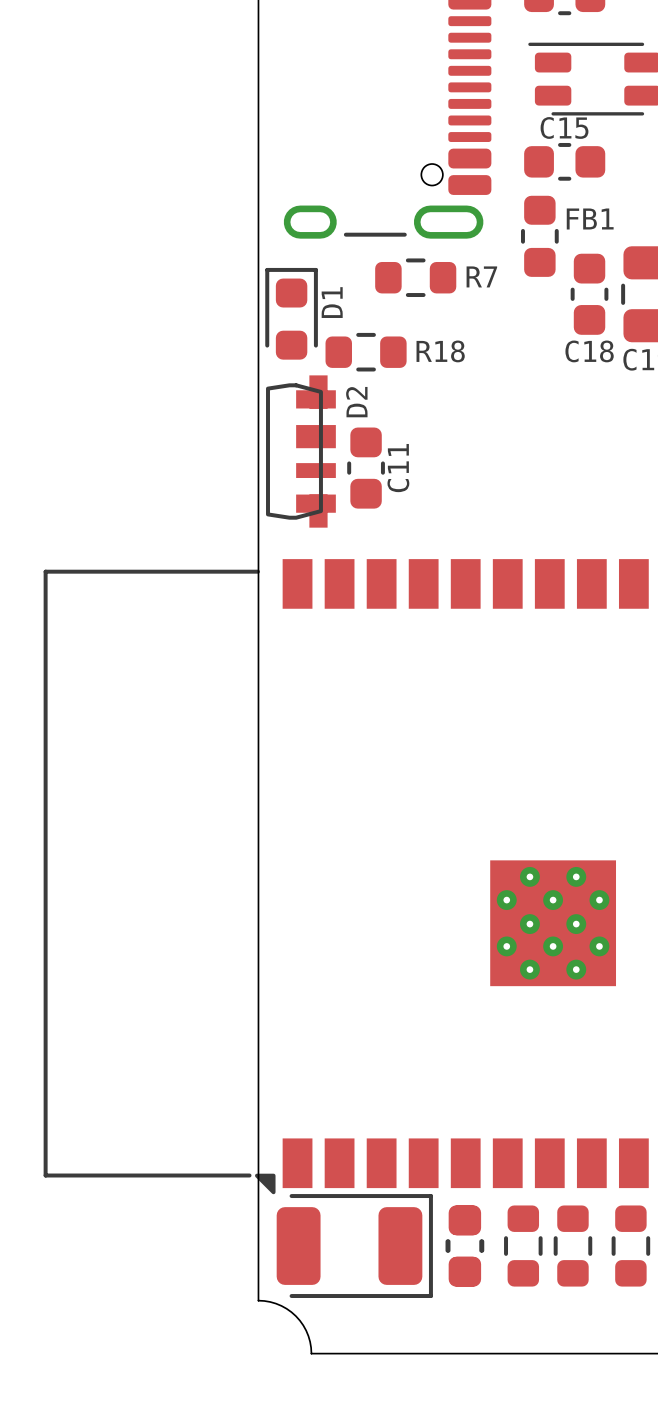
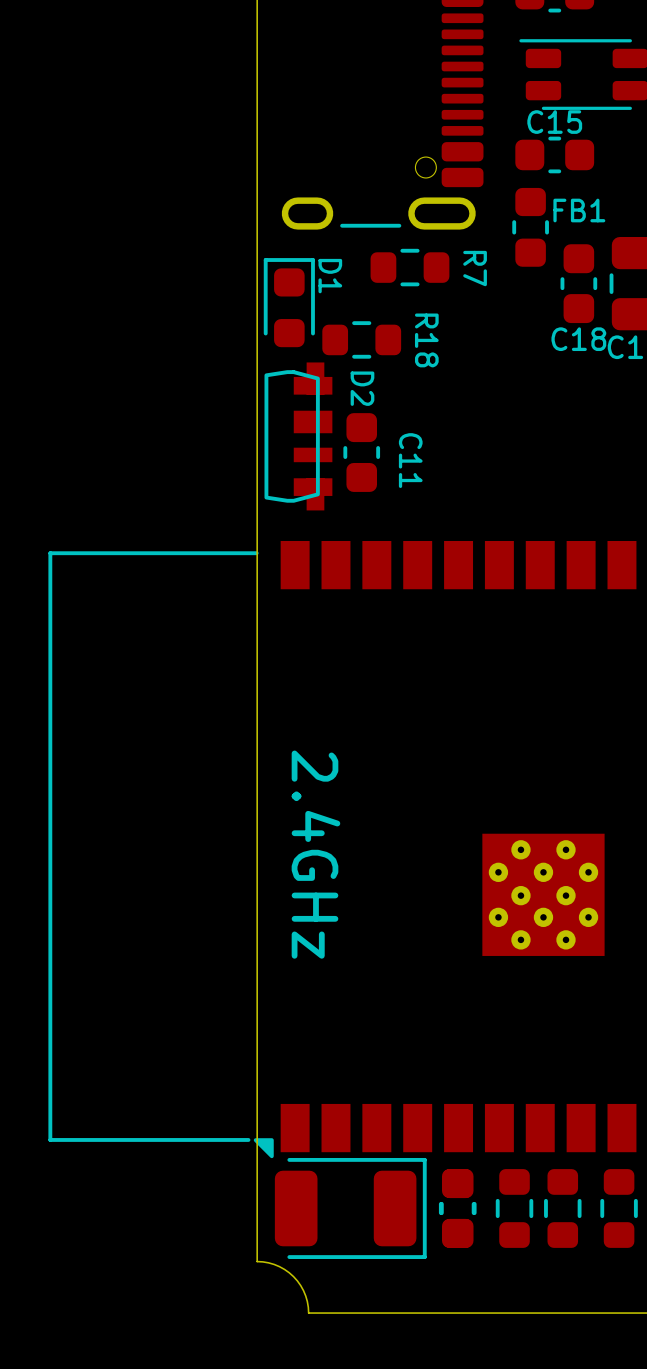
R7 name rotation: 0° (481, 276) -> 90° clockwise (475, 268)
D1 name rotation: 0° (332, 302) -> 180° (330, 276)
R18 name rotation: 0° (440, 351) -> 90° clockwise (426, 340)
D2 name rotation: 0° (356, 402) -> 180° (362, 388)
C11 name rotation: 0° (398, 468) -> 180° (410, 460)
text: none -> 2.4GHz (315, 854)

